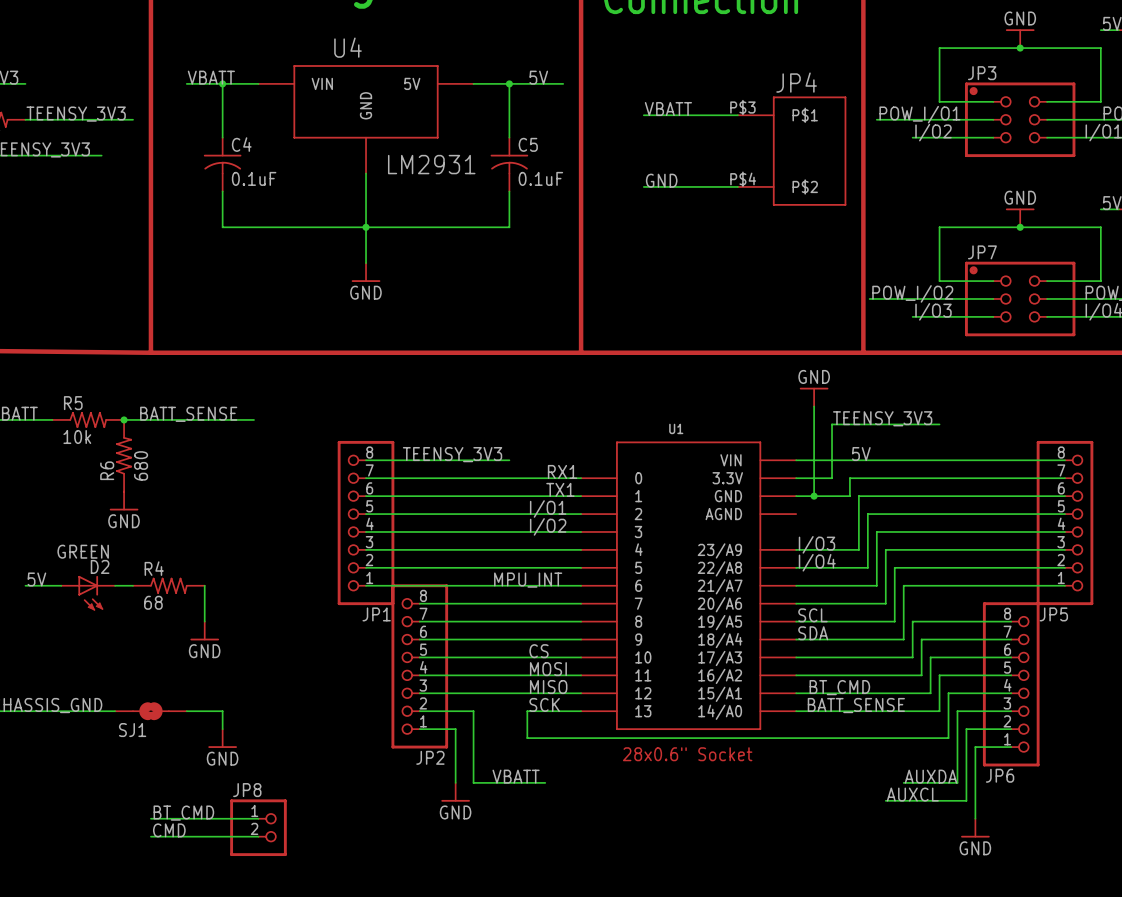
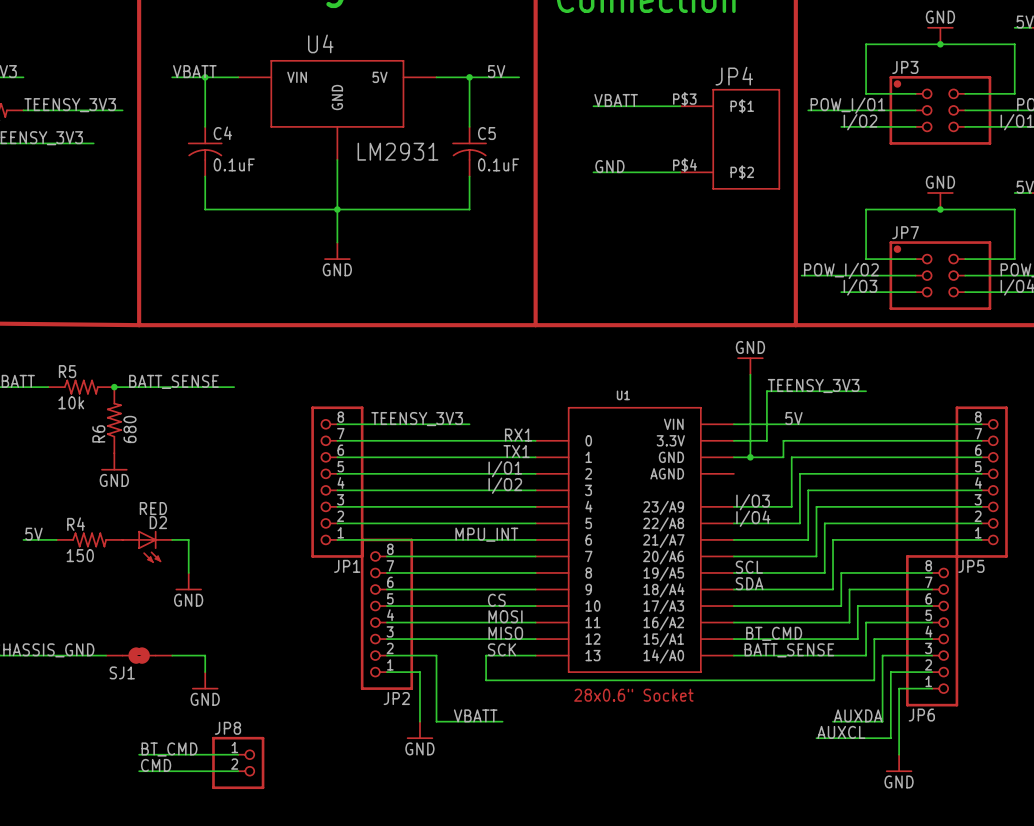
D2 value: GREEN (83, 551) -> RED (153, 508)
R4 position: (168, 585) -> (89, 539)
D2 position: (88, 593) -> (147, 546)
R4 value: 68 (153, 602) -> 150 (80, 555)

